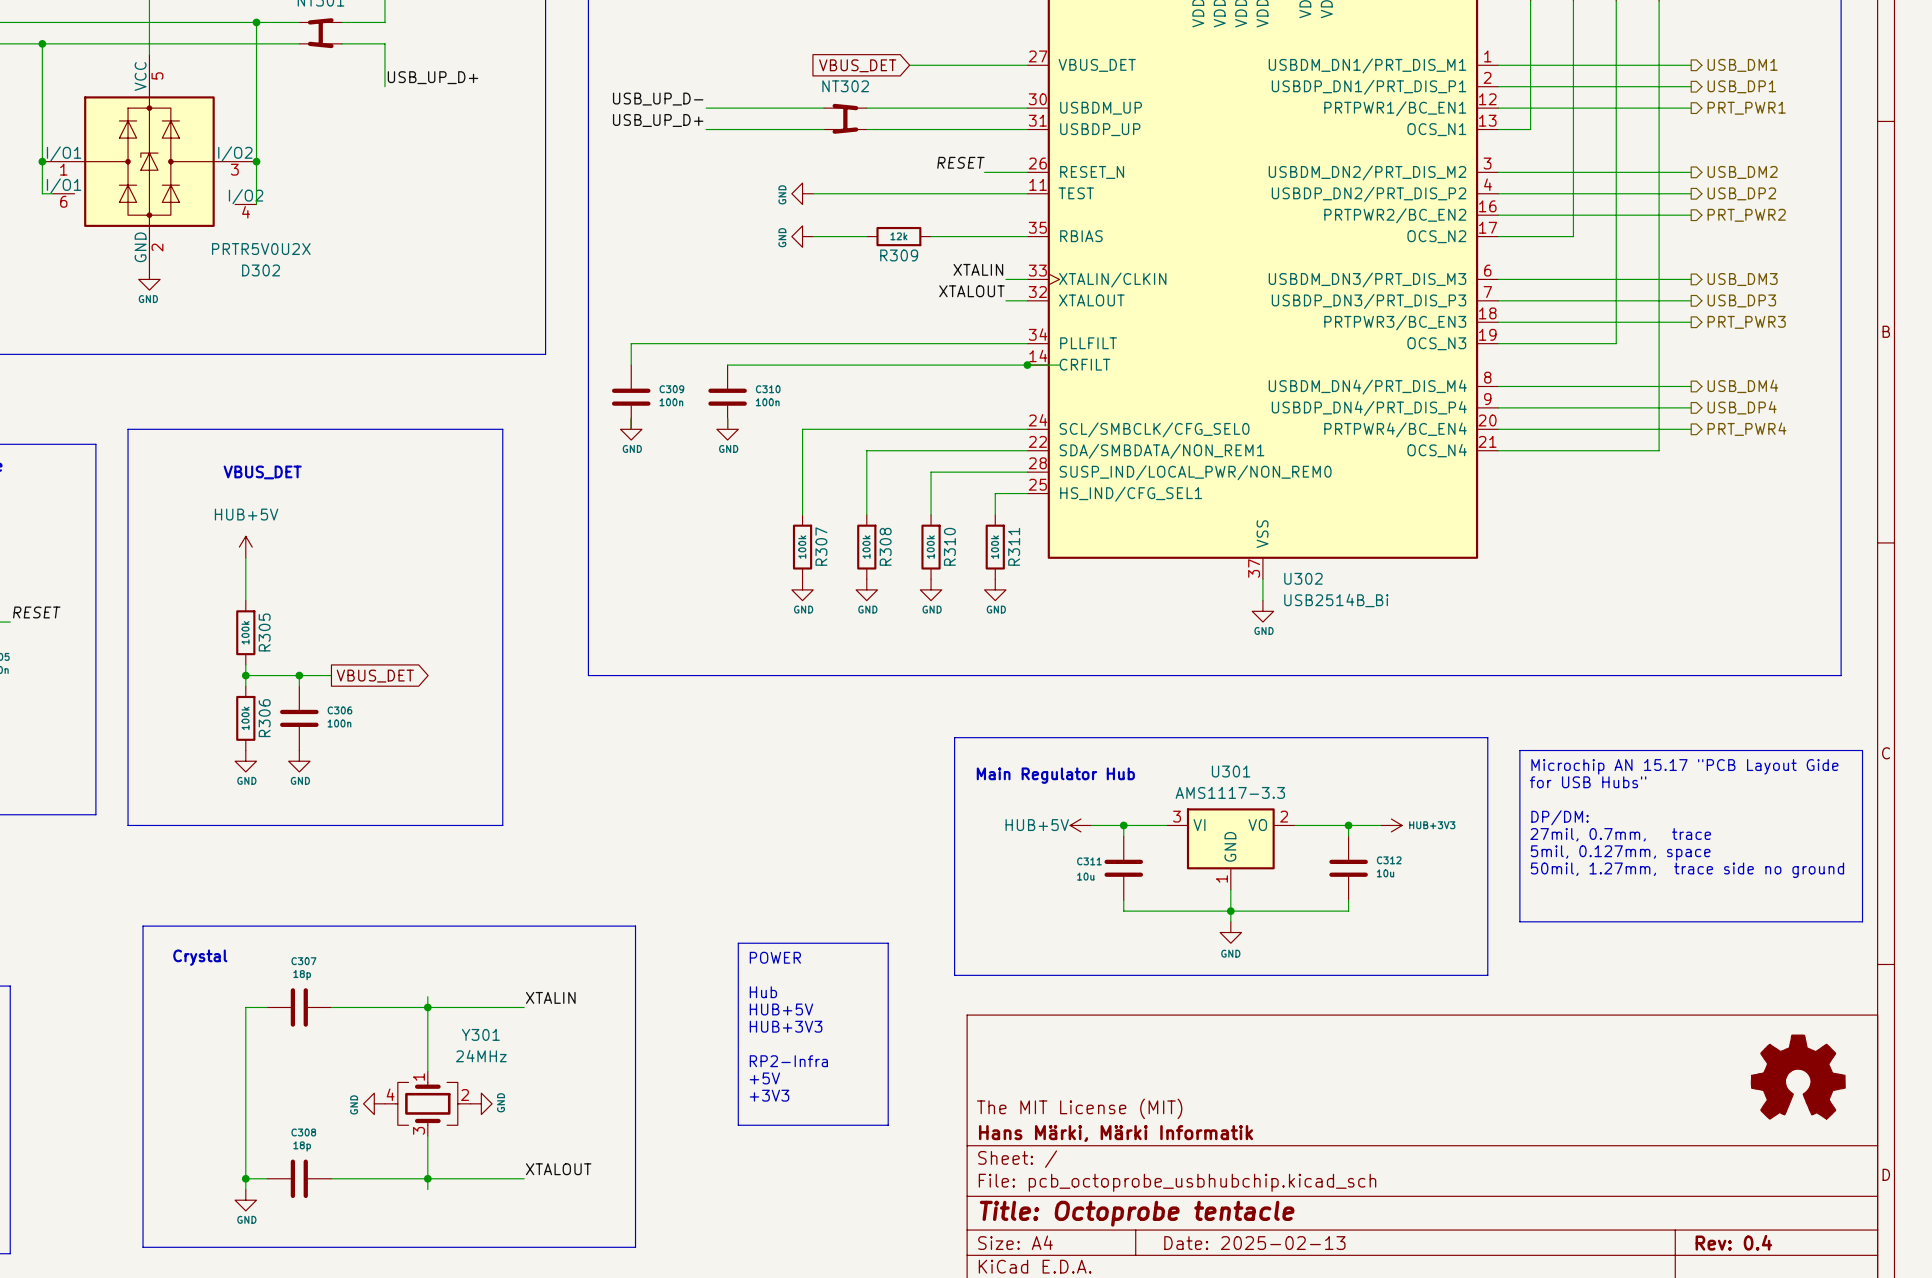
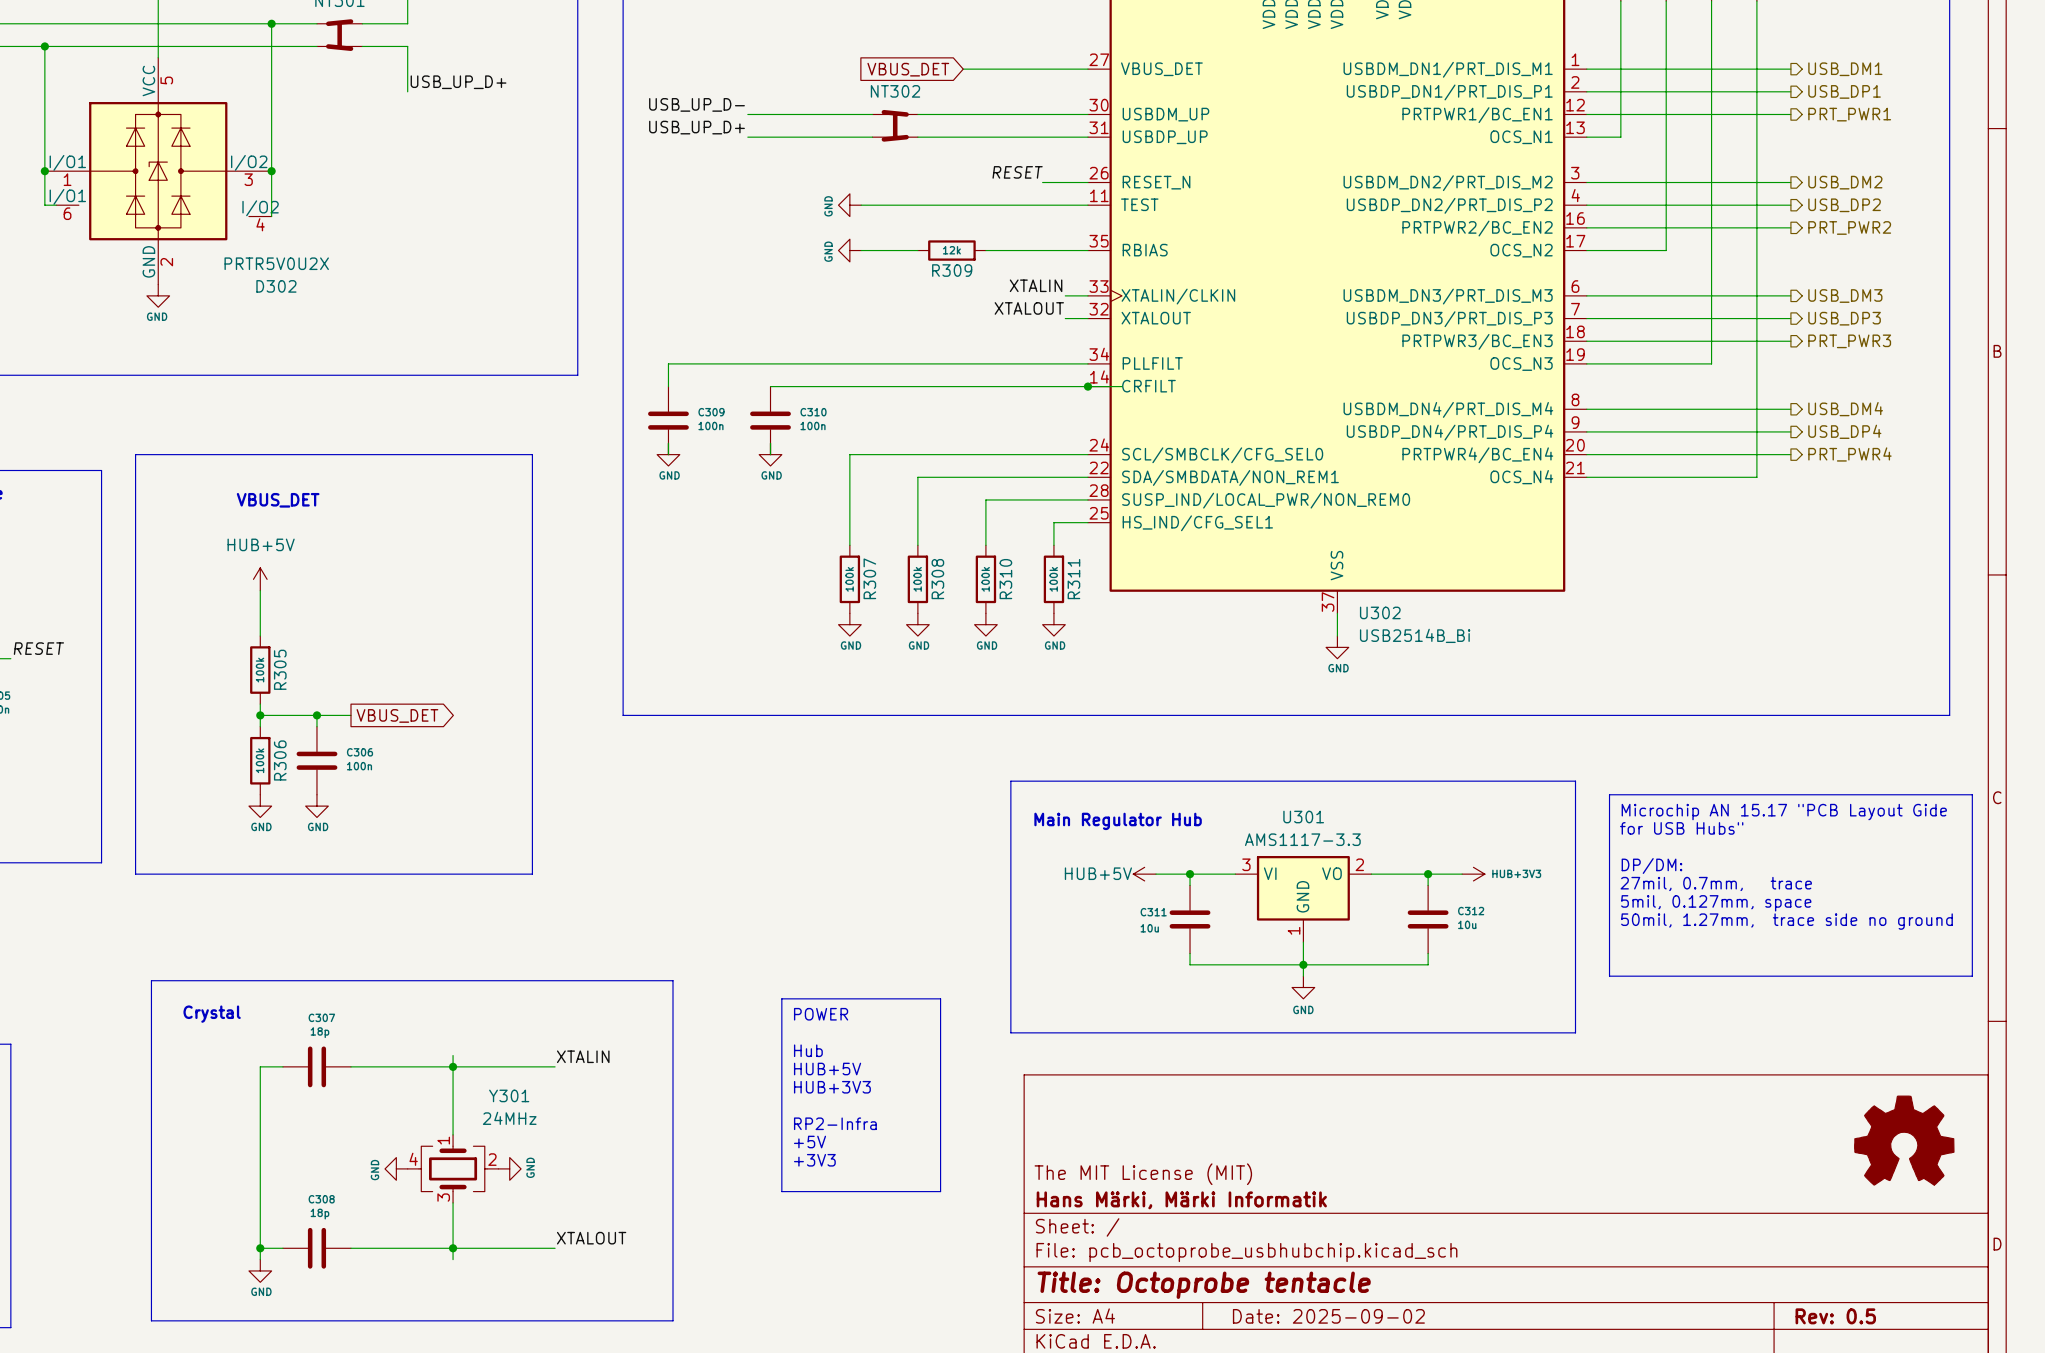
title block: Rev: 0.4 (1733, 1242) -> Rev: 0.5 (1835, 1316)
title block: Date: 2025-02-13 (1254, 1243) -> Date: 2025-09-02 (1328, 1316)

